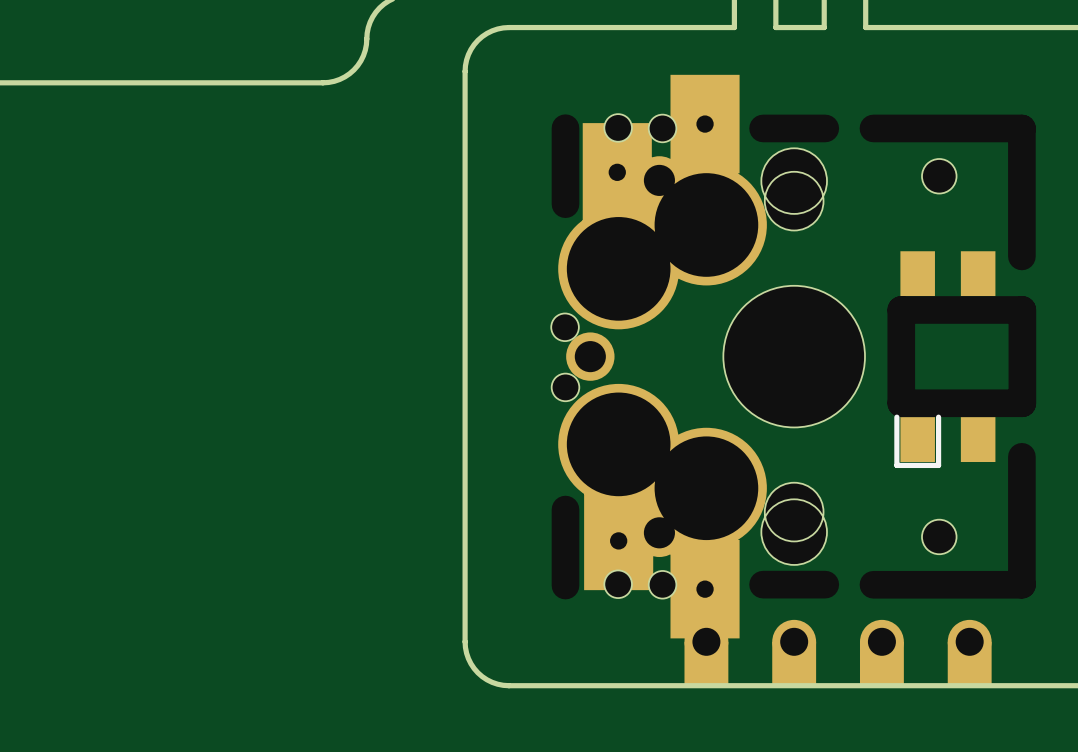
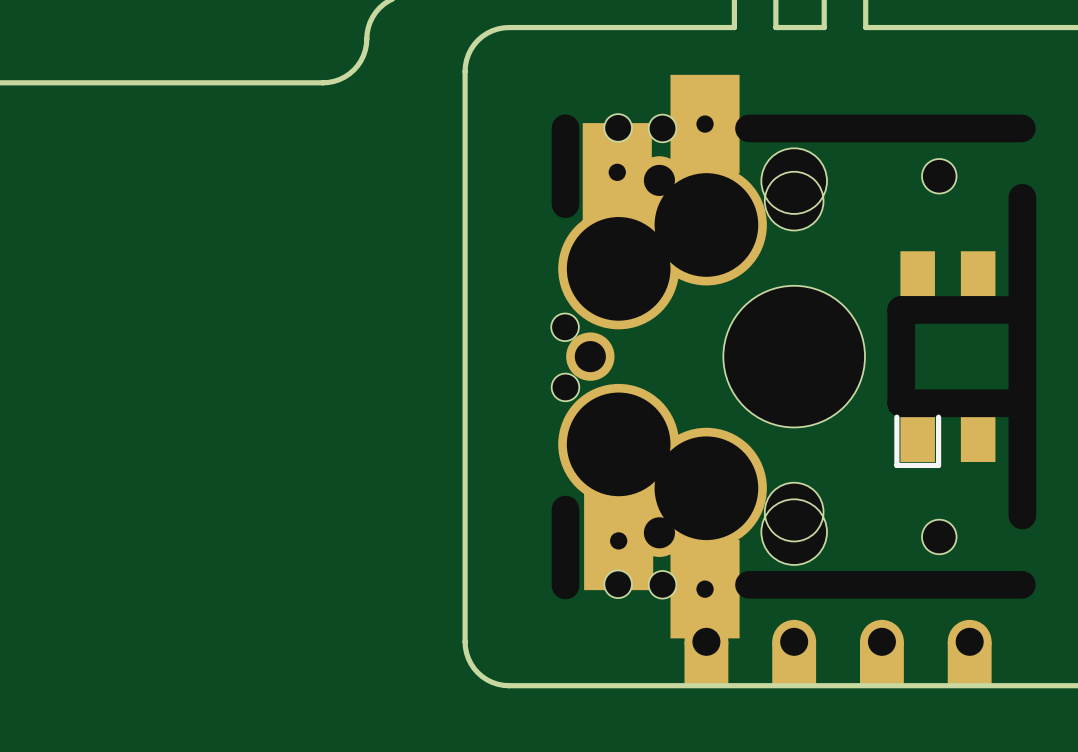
part footprint: [551, 74, 1037, 639] -> [551, 74, 1037, 639]

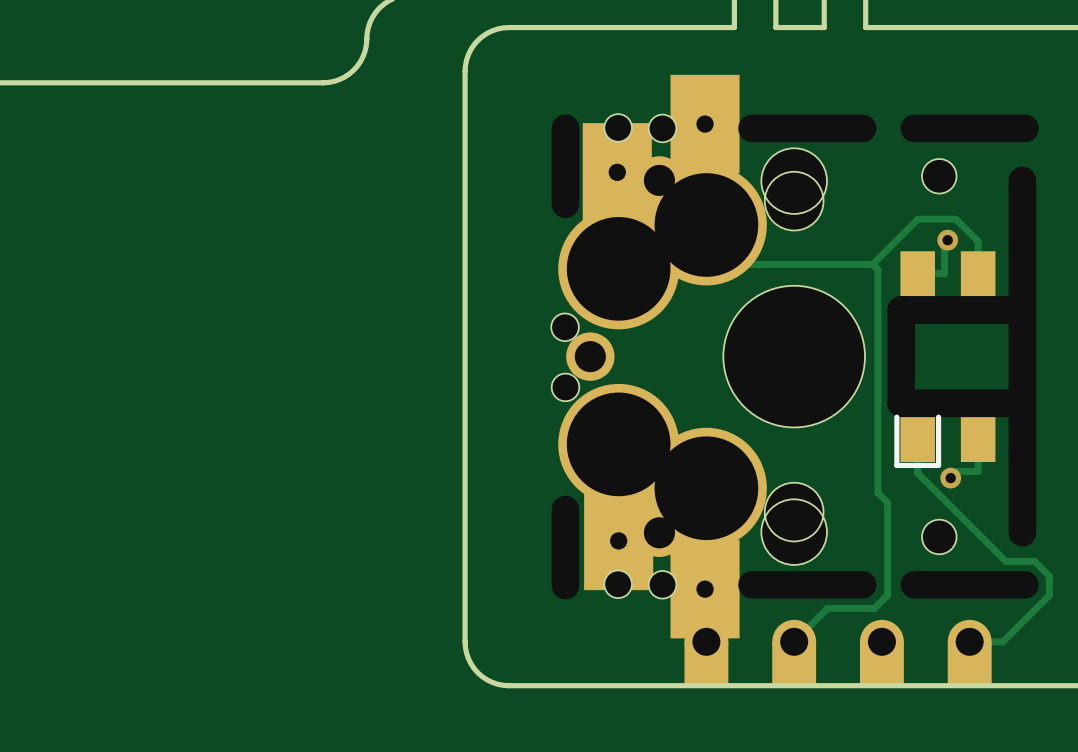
part footprint: [551, 74, 1037, 639] -> [551, 74, 1039, 639]
track: none -> (706, 224) (745, 264) (872, 264)
track: none -> (947, 240) (944, 243) (944, 273) (917, 273)
via: none -> (947, 240)
track: none -> (872, 264) (877, 269) (877, 492) (887, 502) (887, 595) (874, 608) (827, 608) (794, 641) (794, 663)
track: none -> (872, 264) (917, 219) (955, 219) (978, 241) (978, 273)
track: none -> (917, 439) (917, 473) (1005, 561) (1034, 561) (1049, 576) (1049, 595) (1002, 641) (969, 641) (969, 663)
track: none -> (978, 439) (978, 471) (957, 471) (950, 478)
via: none -> (950, 478)

